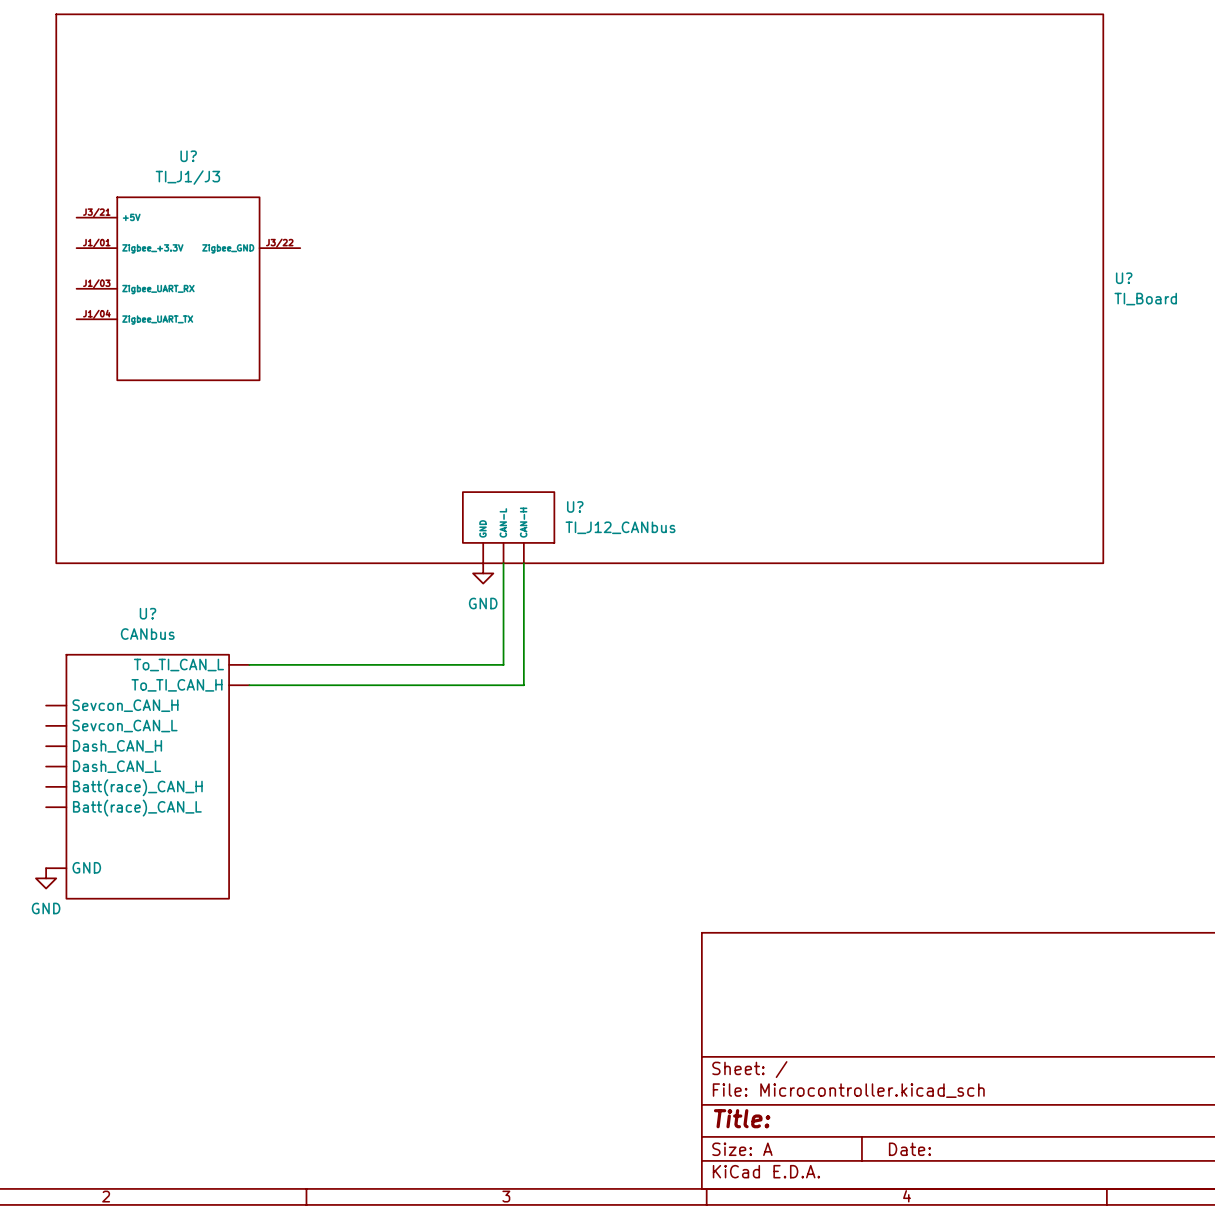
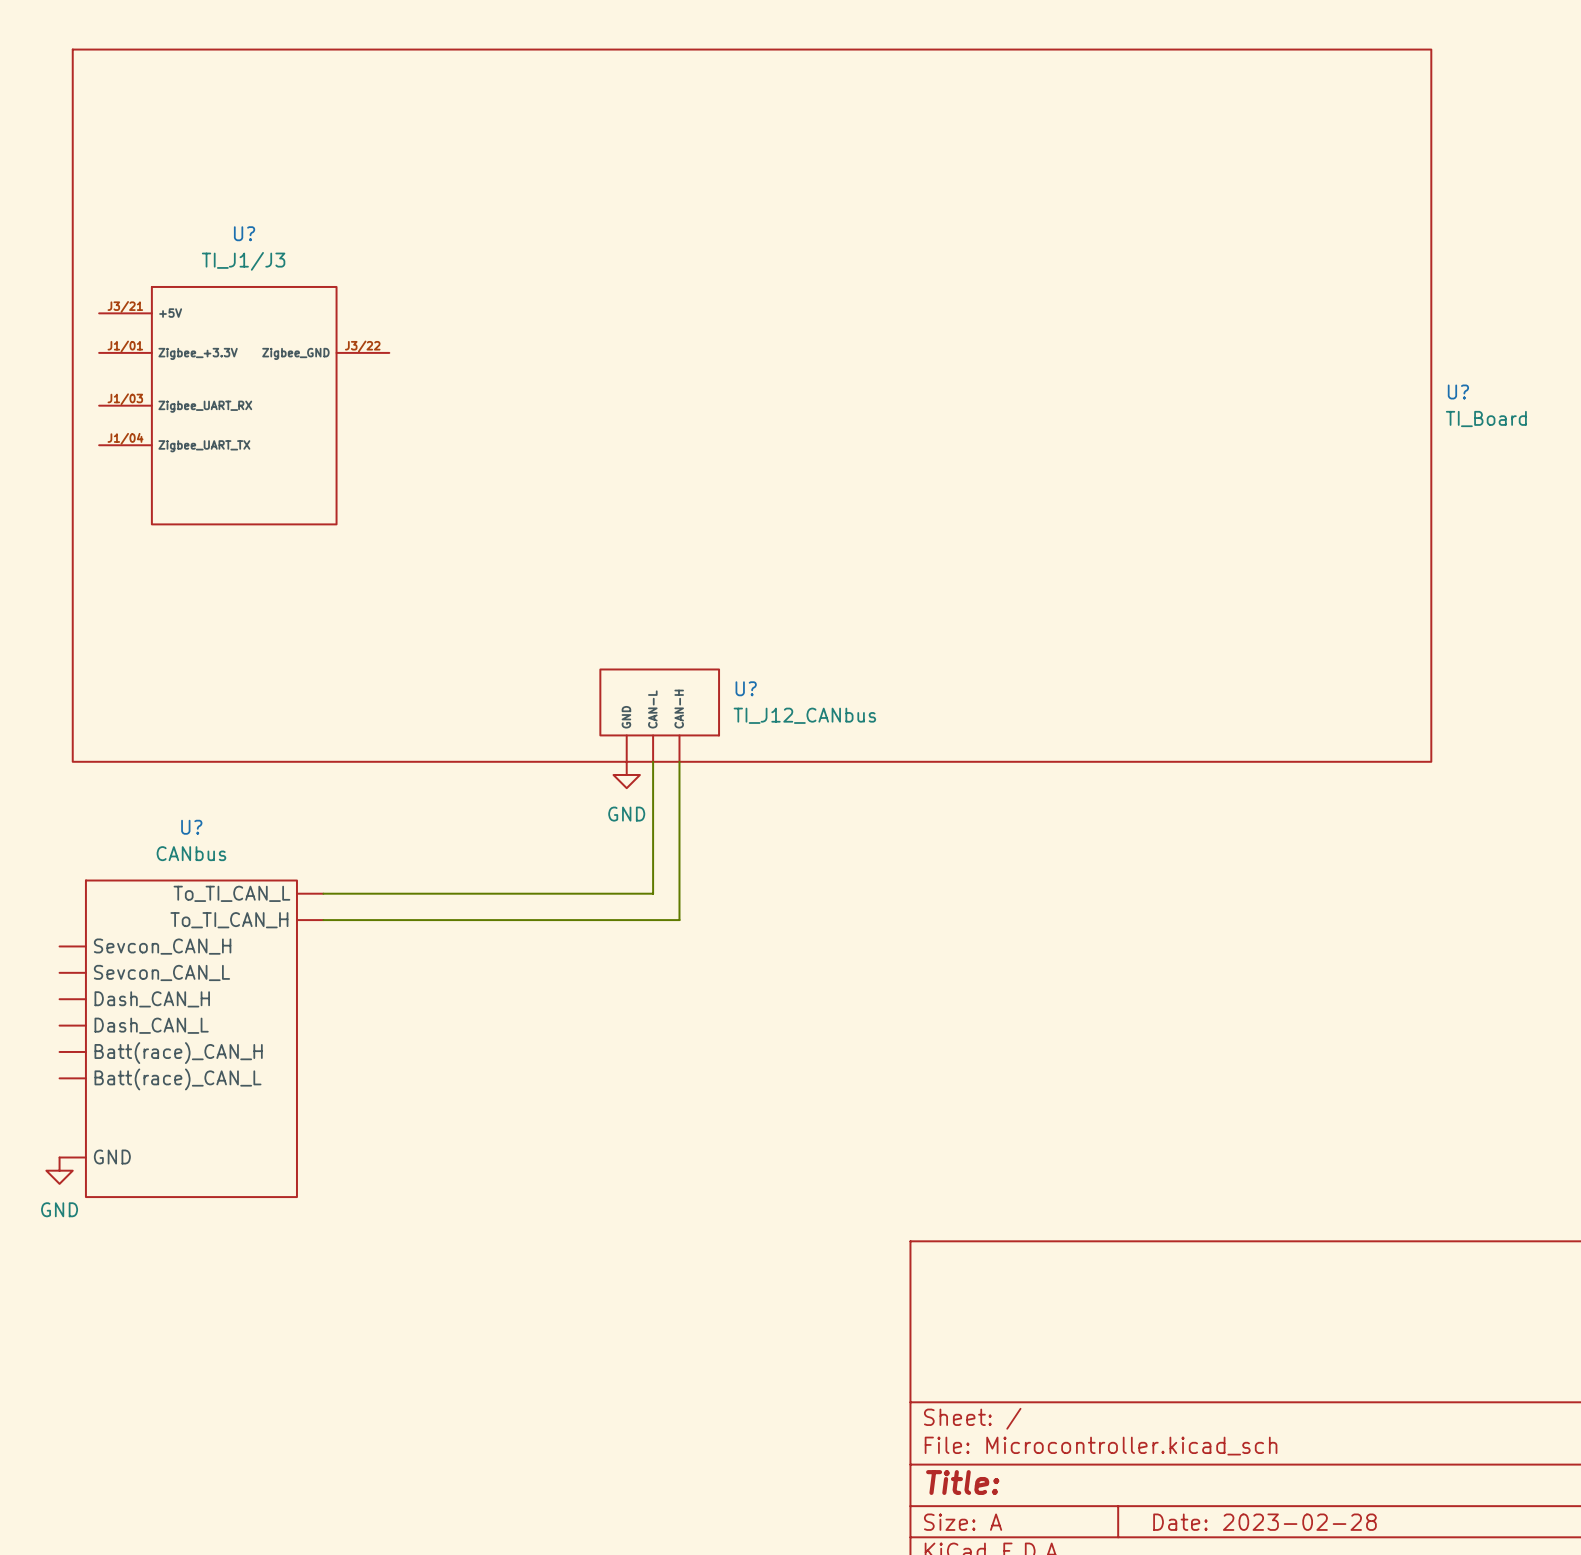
title block: Date: (909, 1149) -> Date: 2023-02-28 (1264, 1522)

